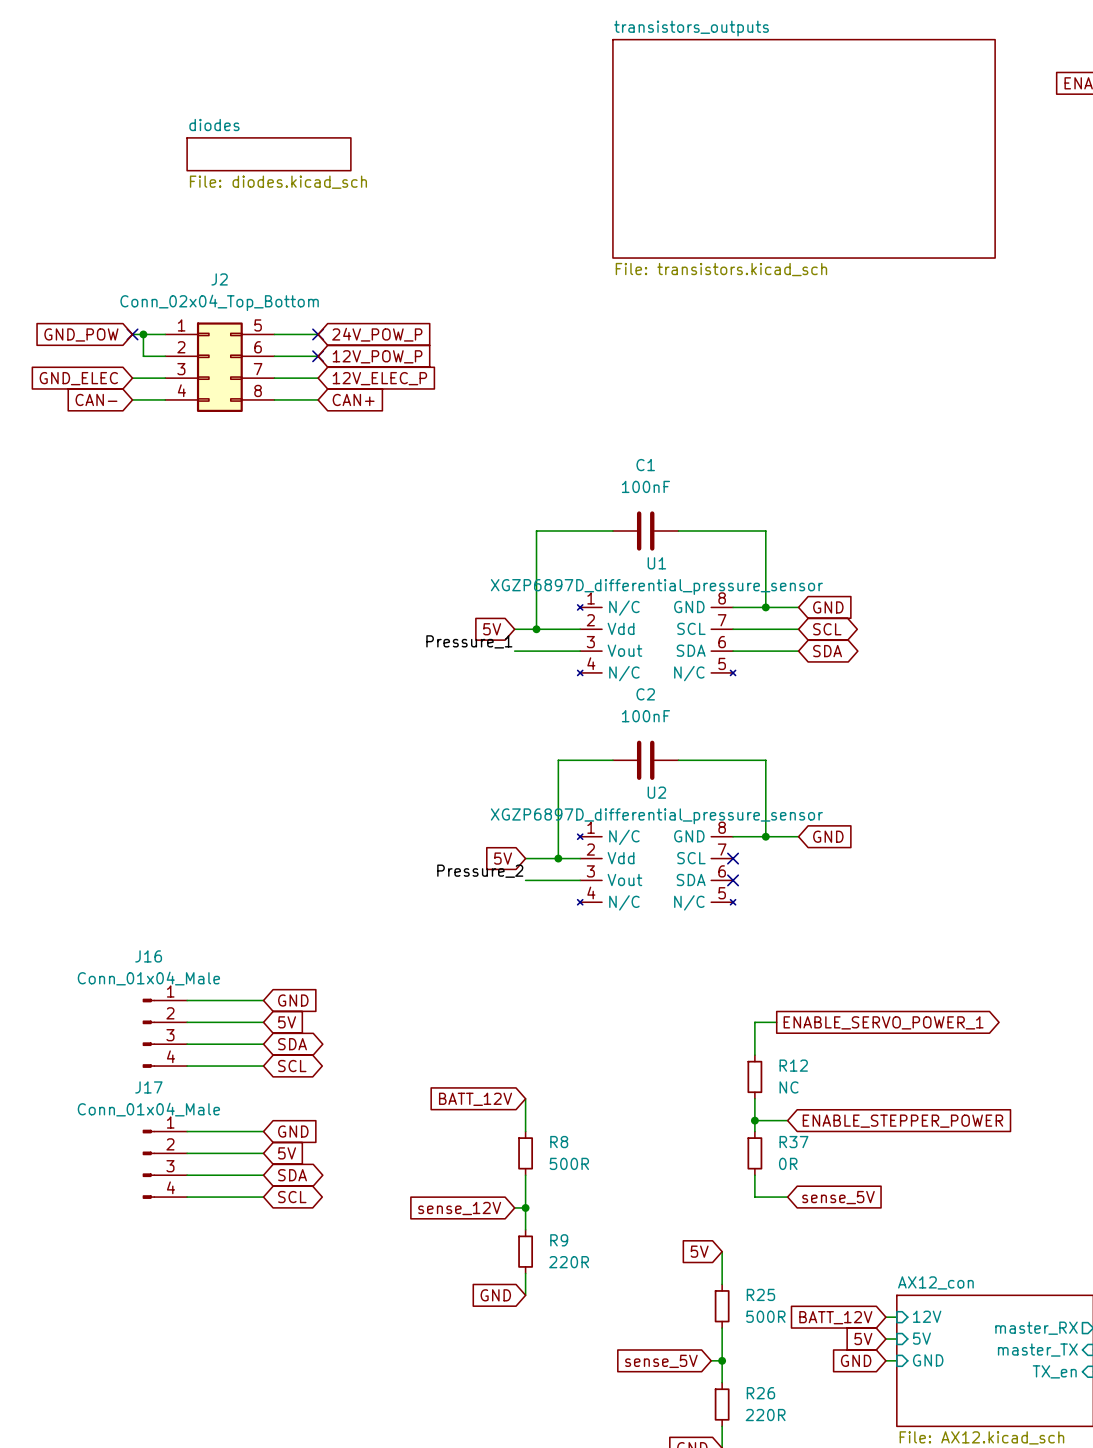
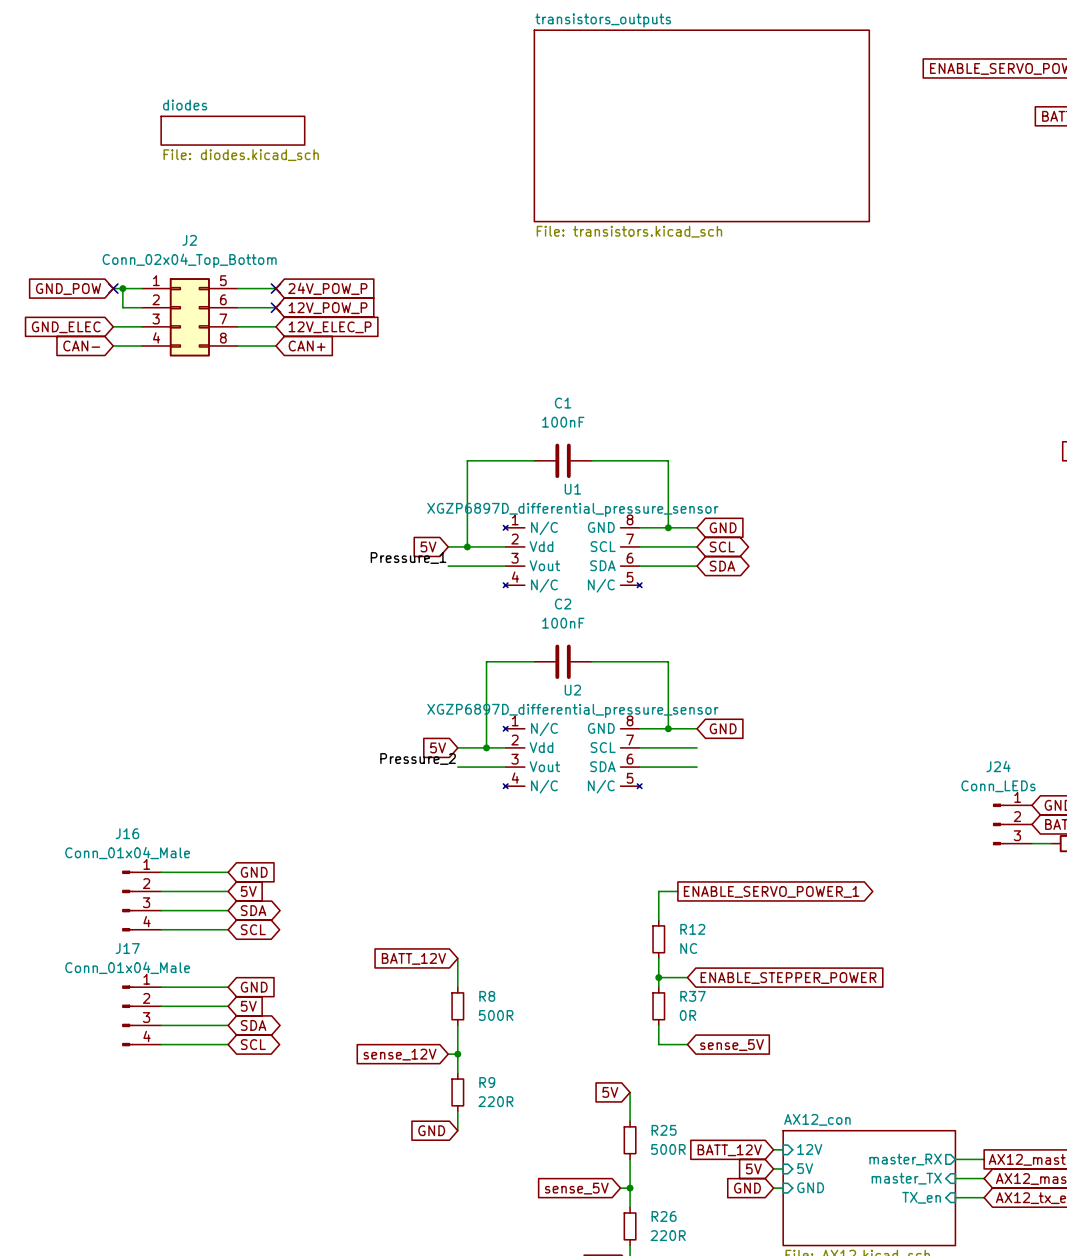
wire: none -> (639, 747) (697, 747)
no-connect mark: (733, 858) -> none
wire: none -> (639, 767) (697, 767)
no-connect mark: (733, 880) -> none

